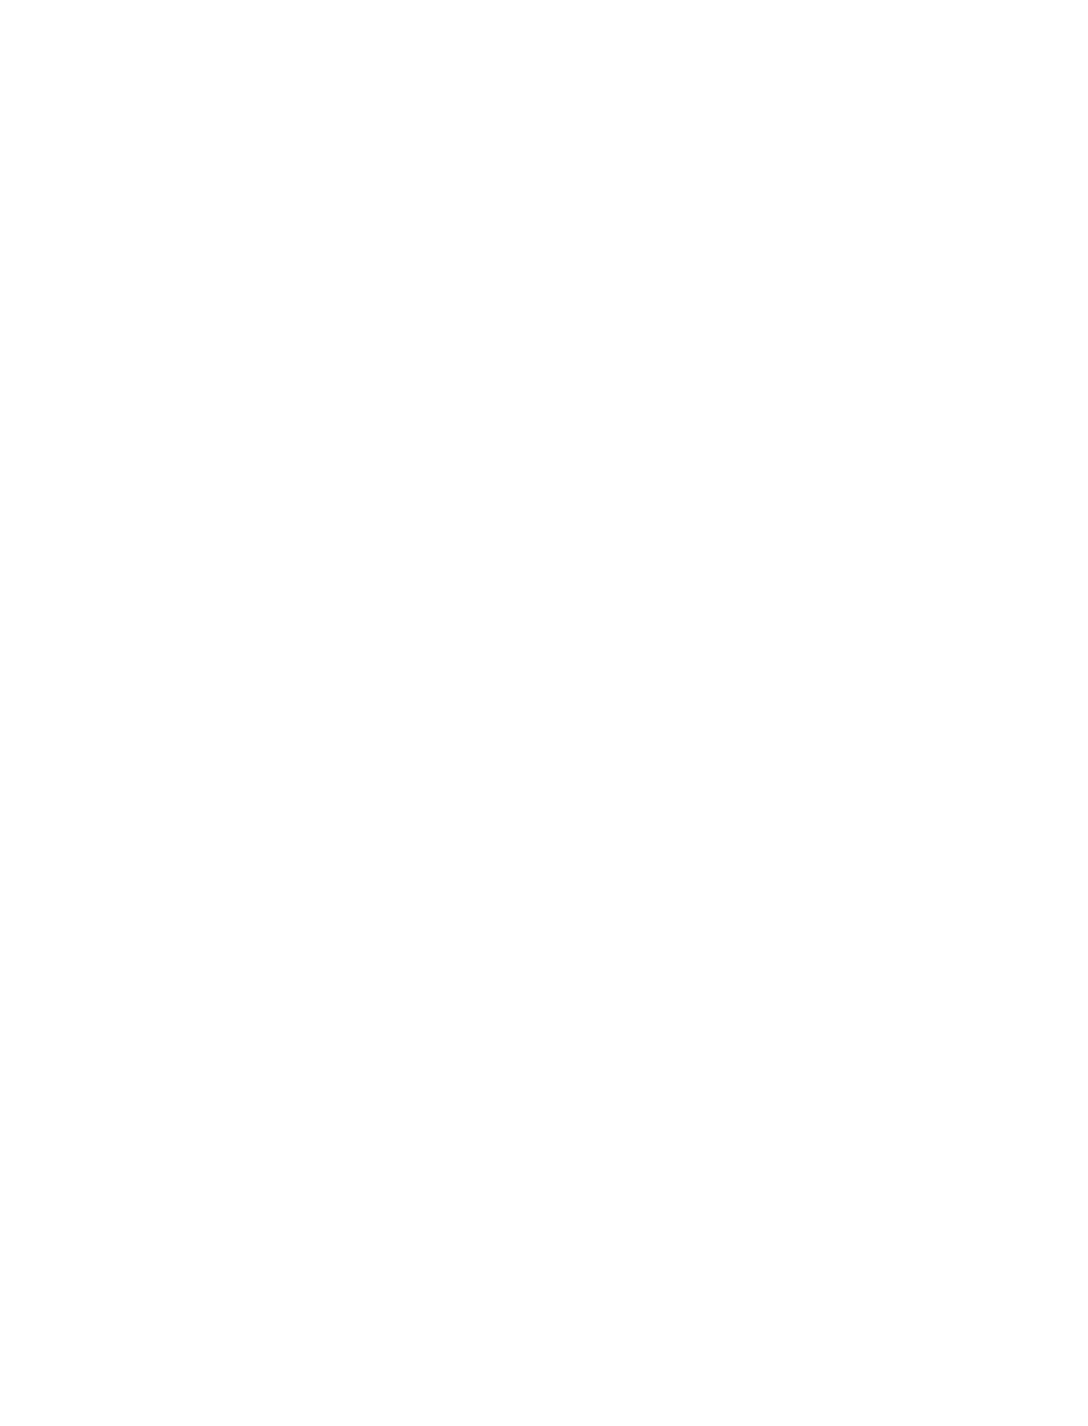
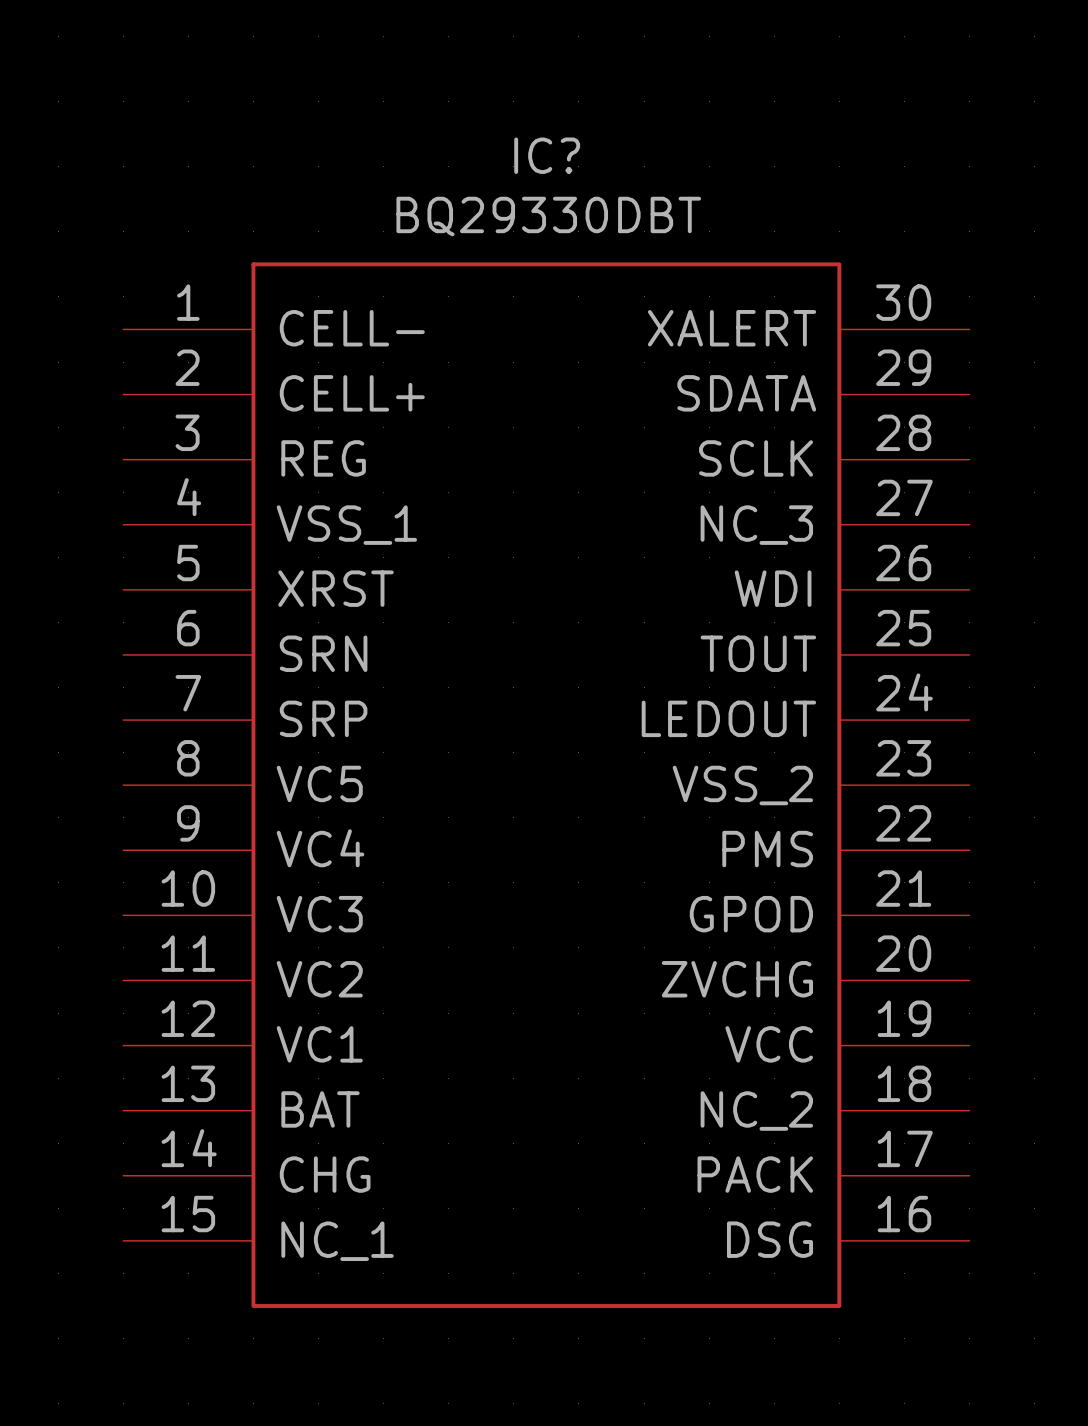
IC?: none -> BQ29330DBT (546, 785)

